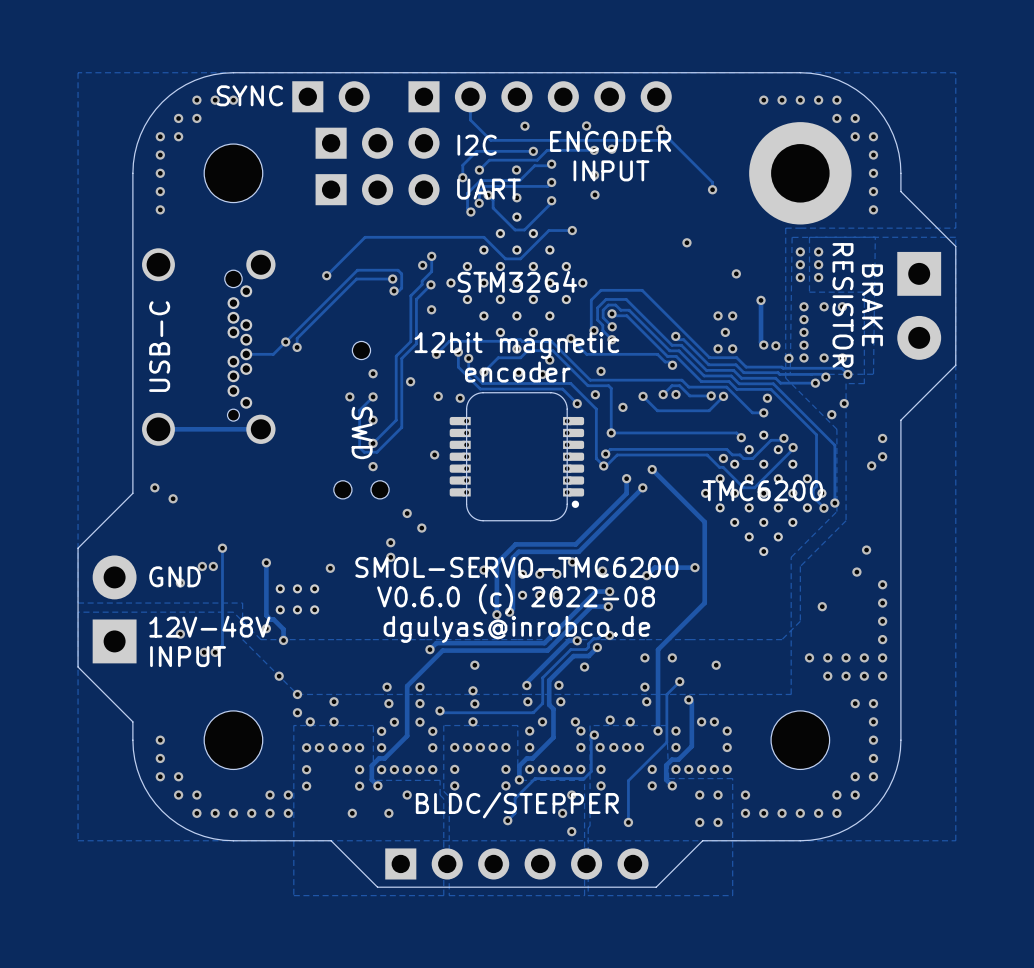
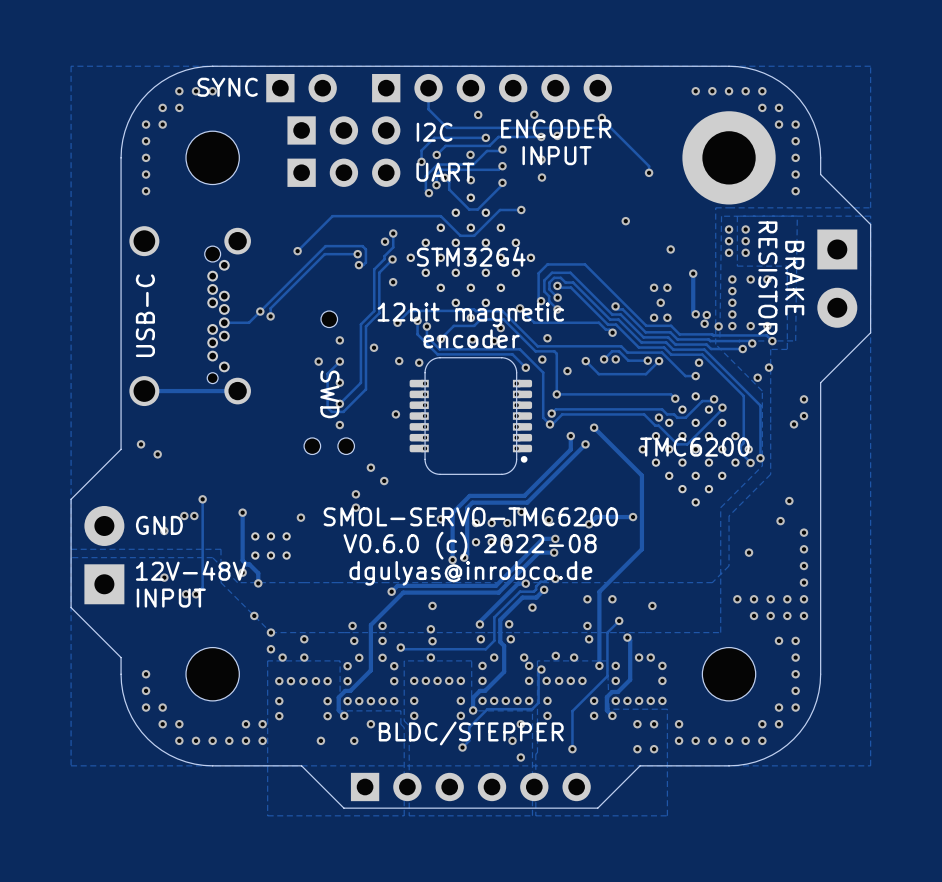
via: none -> (704, 323)

